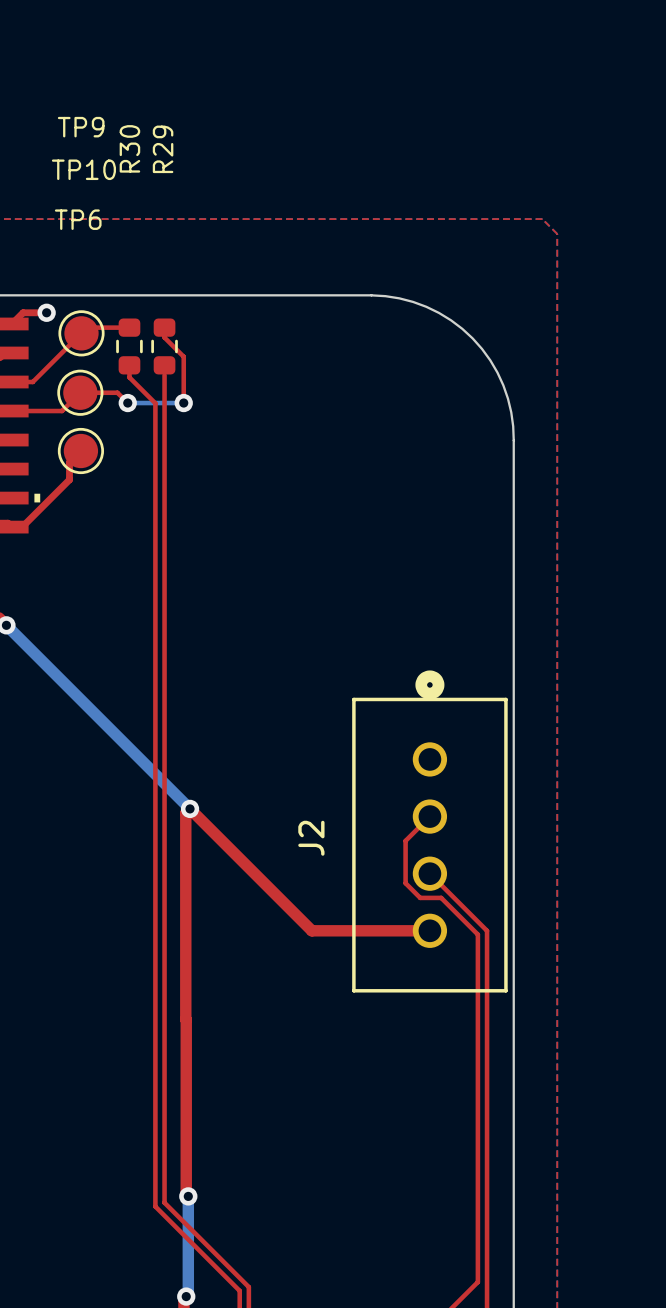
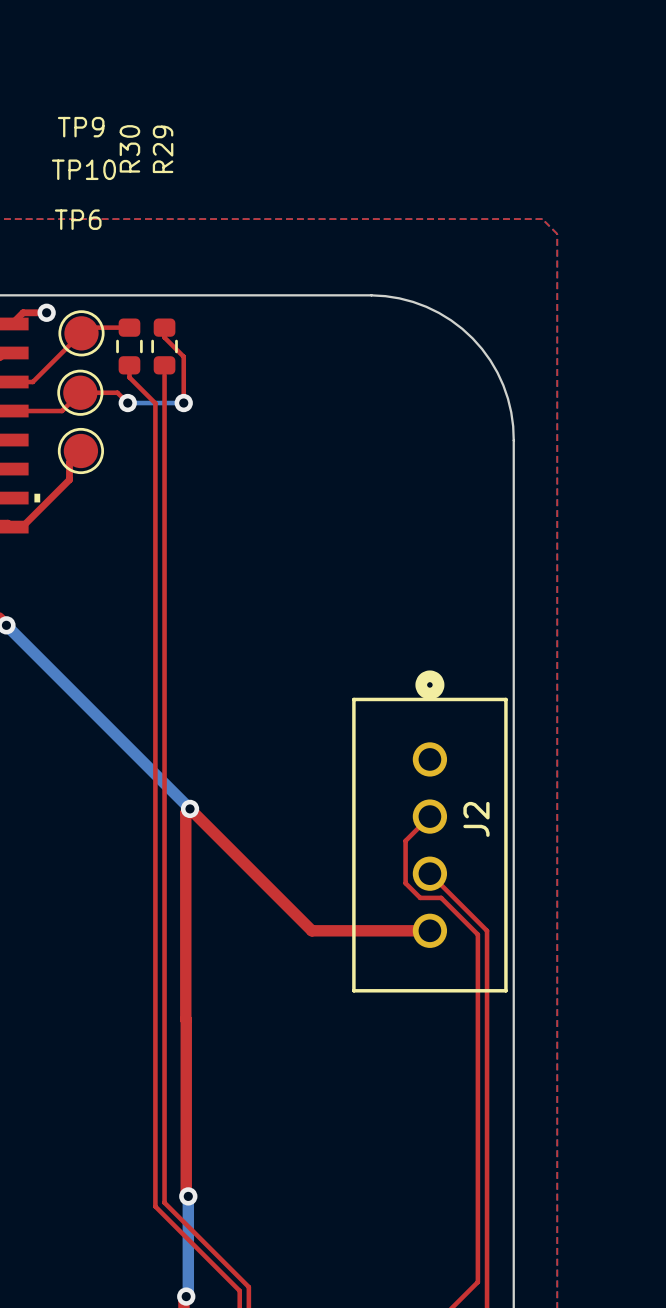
J2 name position: J2 (311, 838) -> J2 (476, 819)

